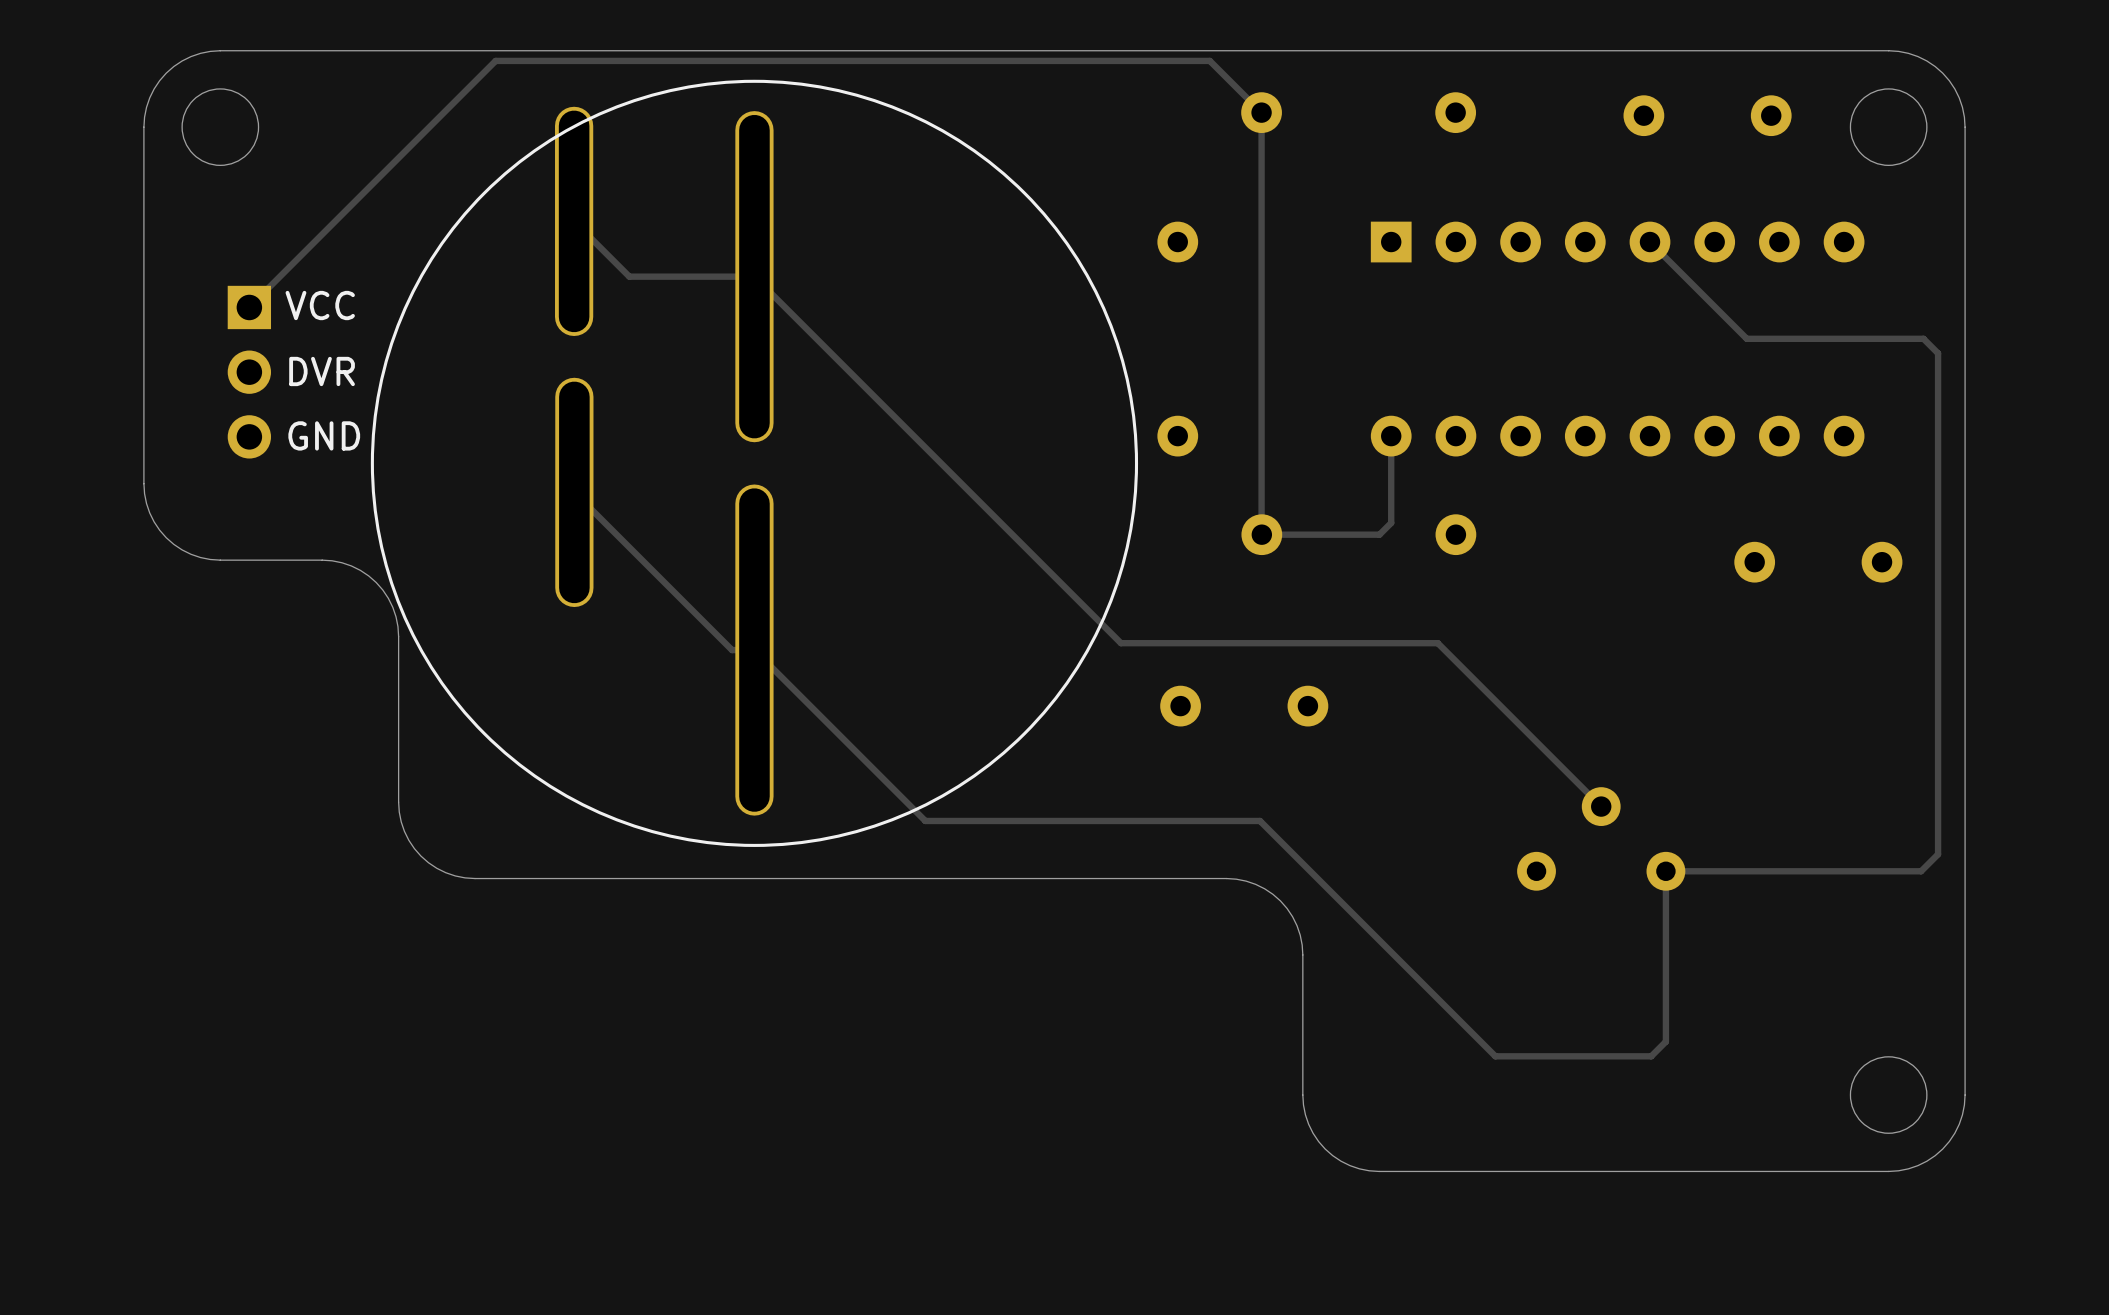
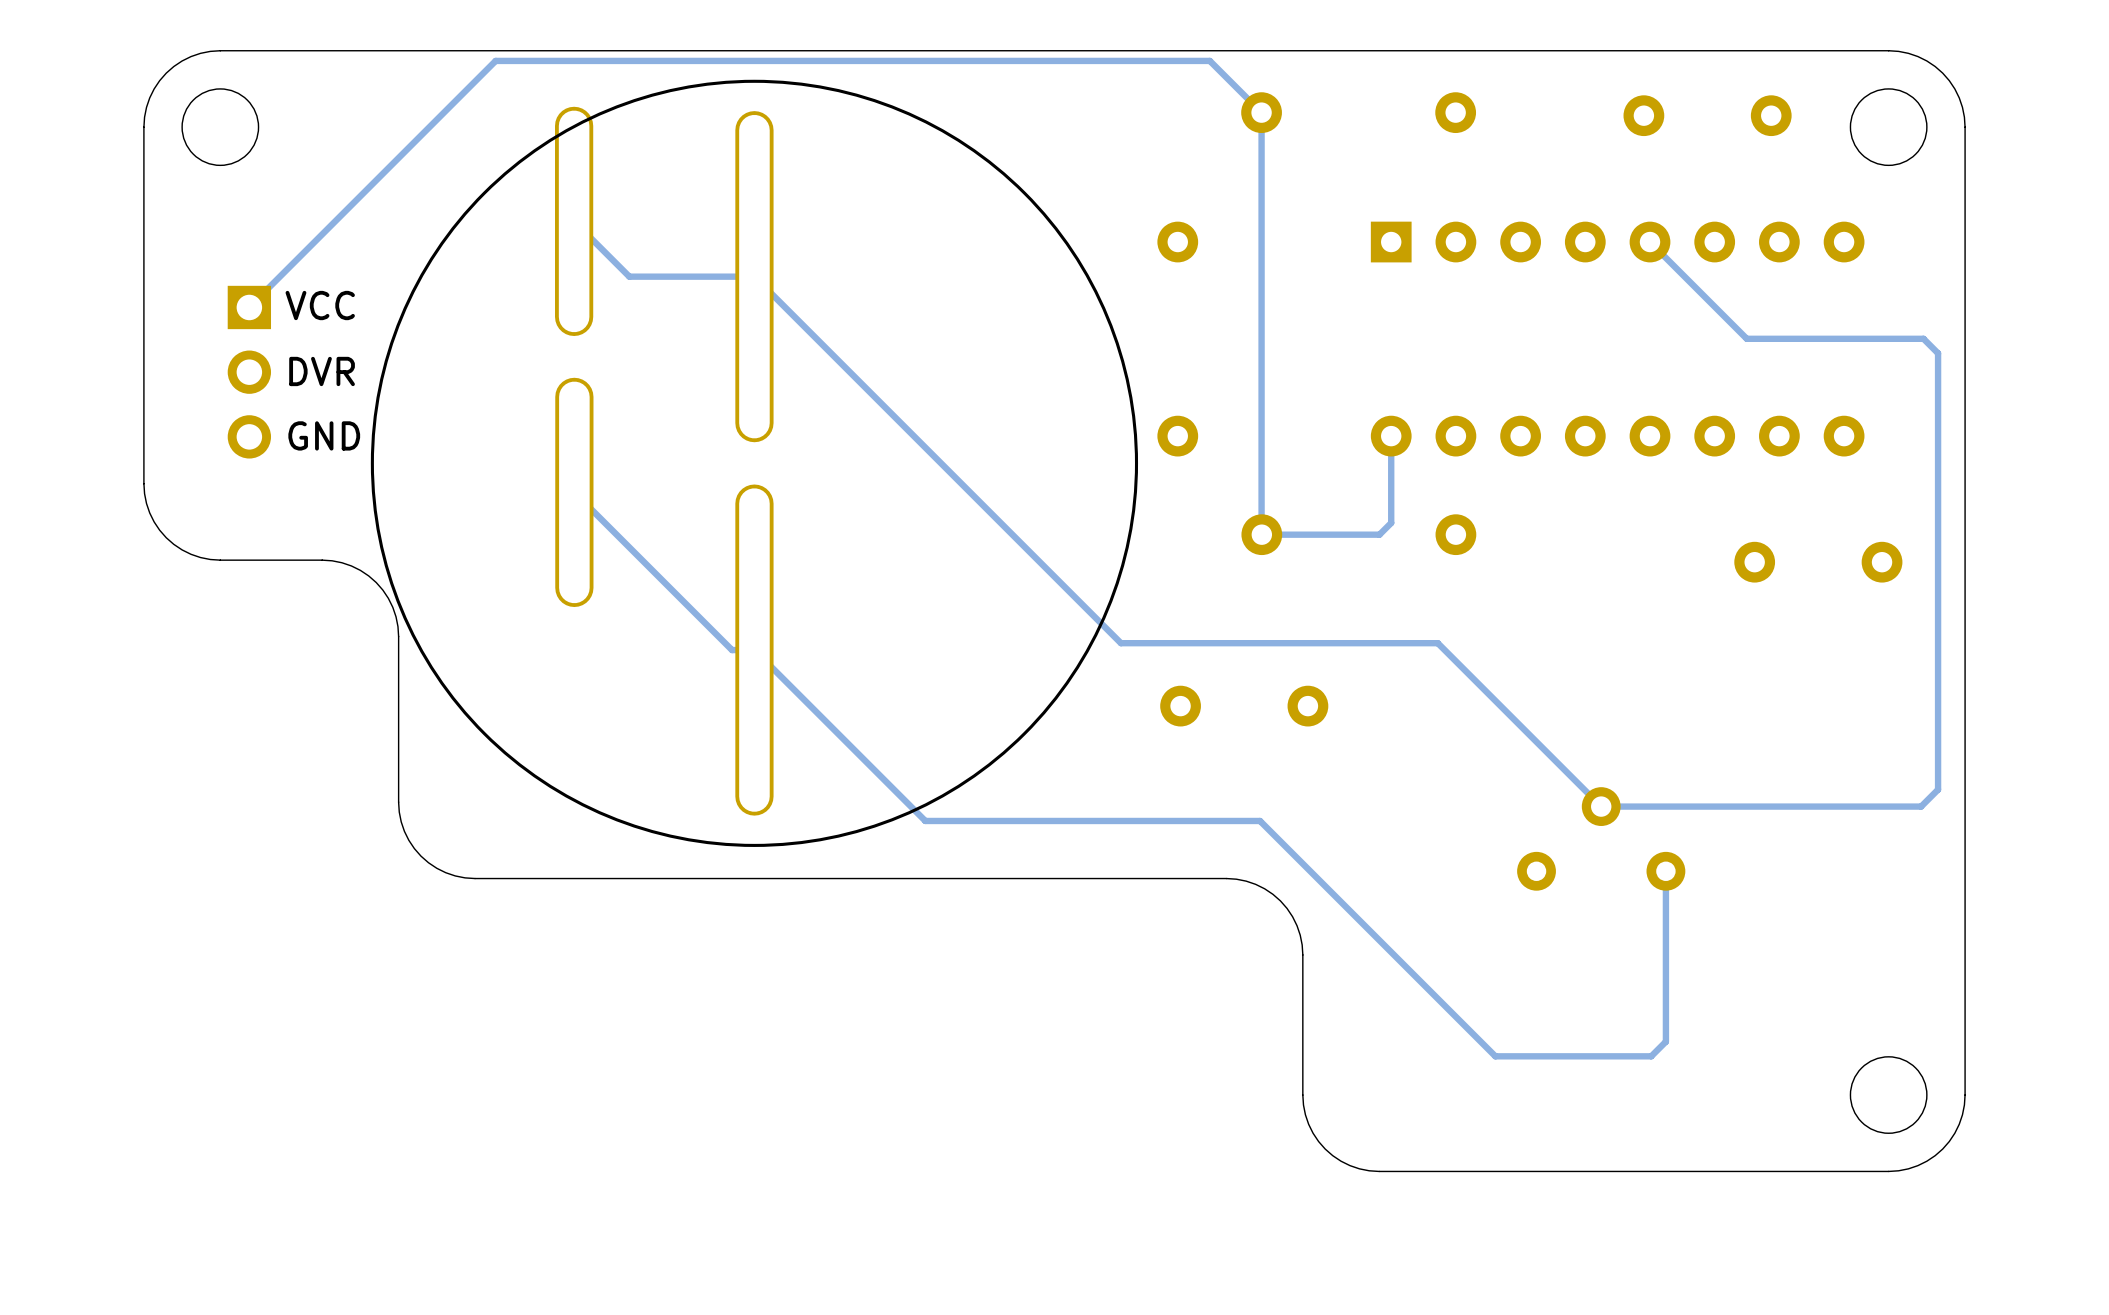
track: (1938, 789) (1938, 854) (1921, 871) (1665, 871) -> (1938, 789) (1921, 806) (1601, 806)

